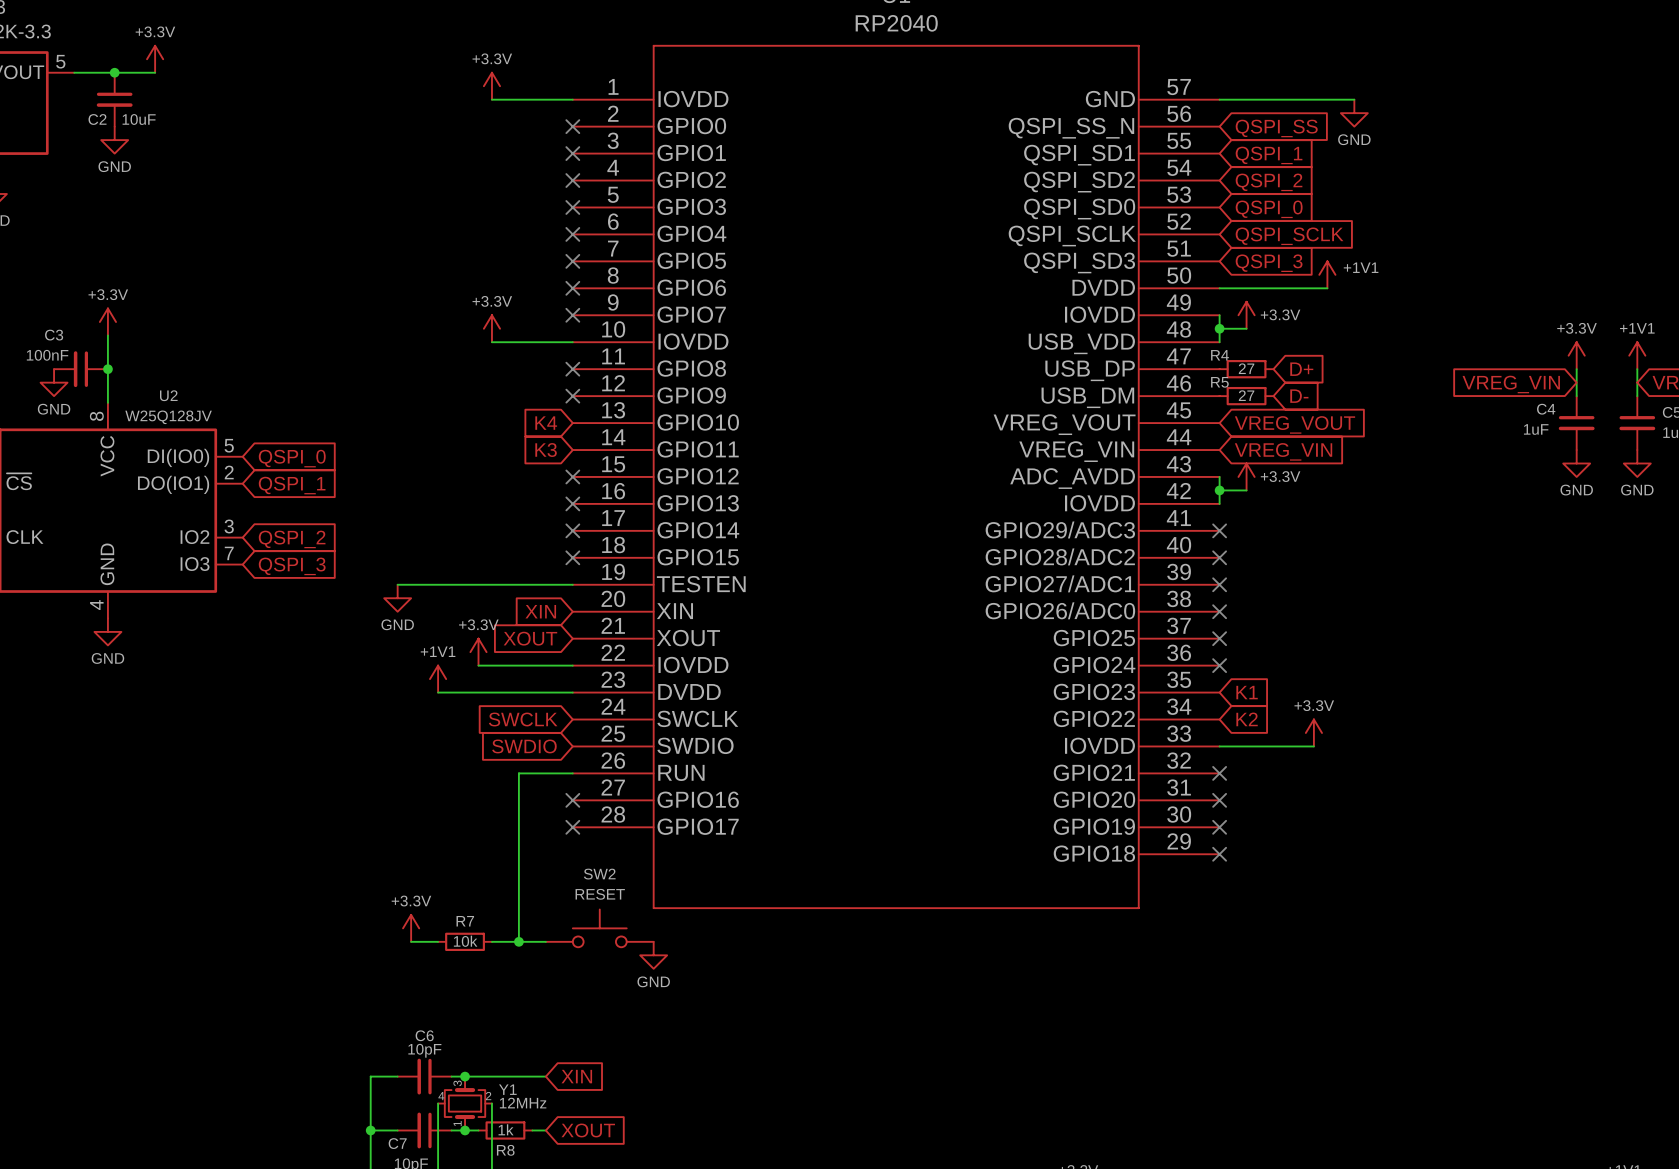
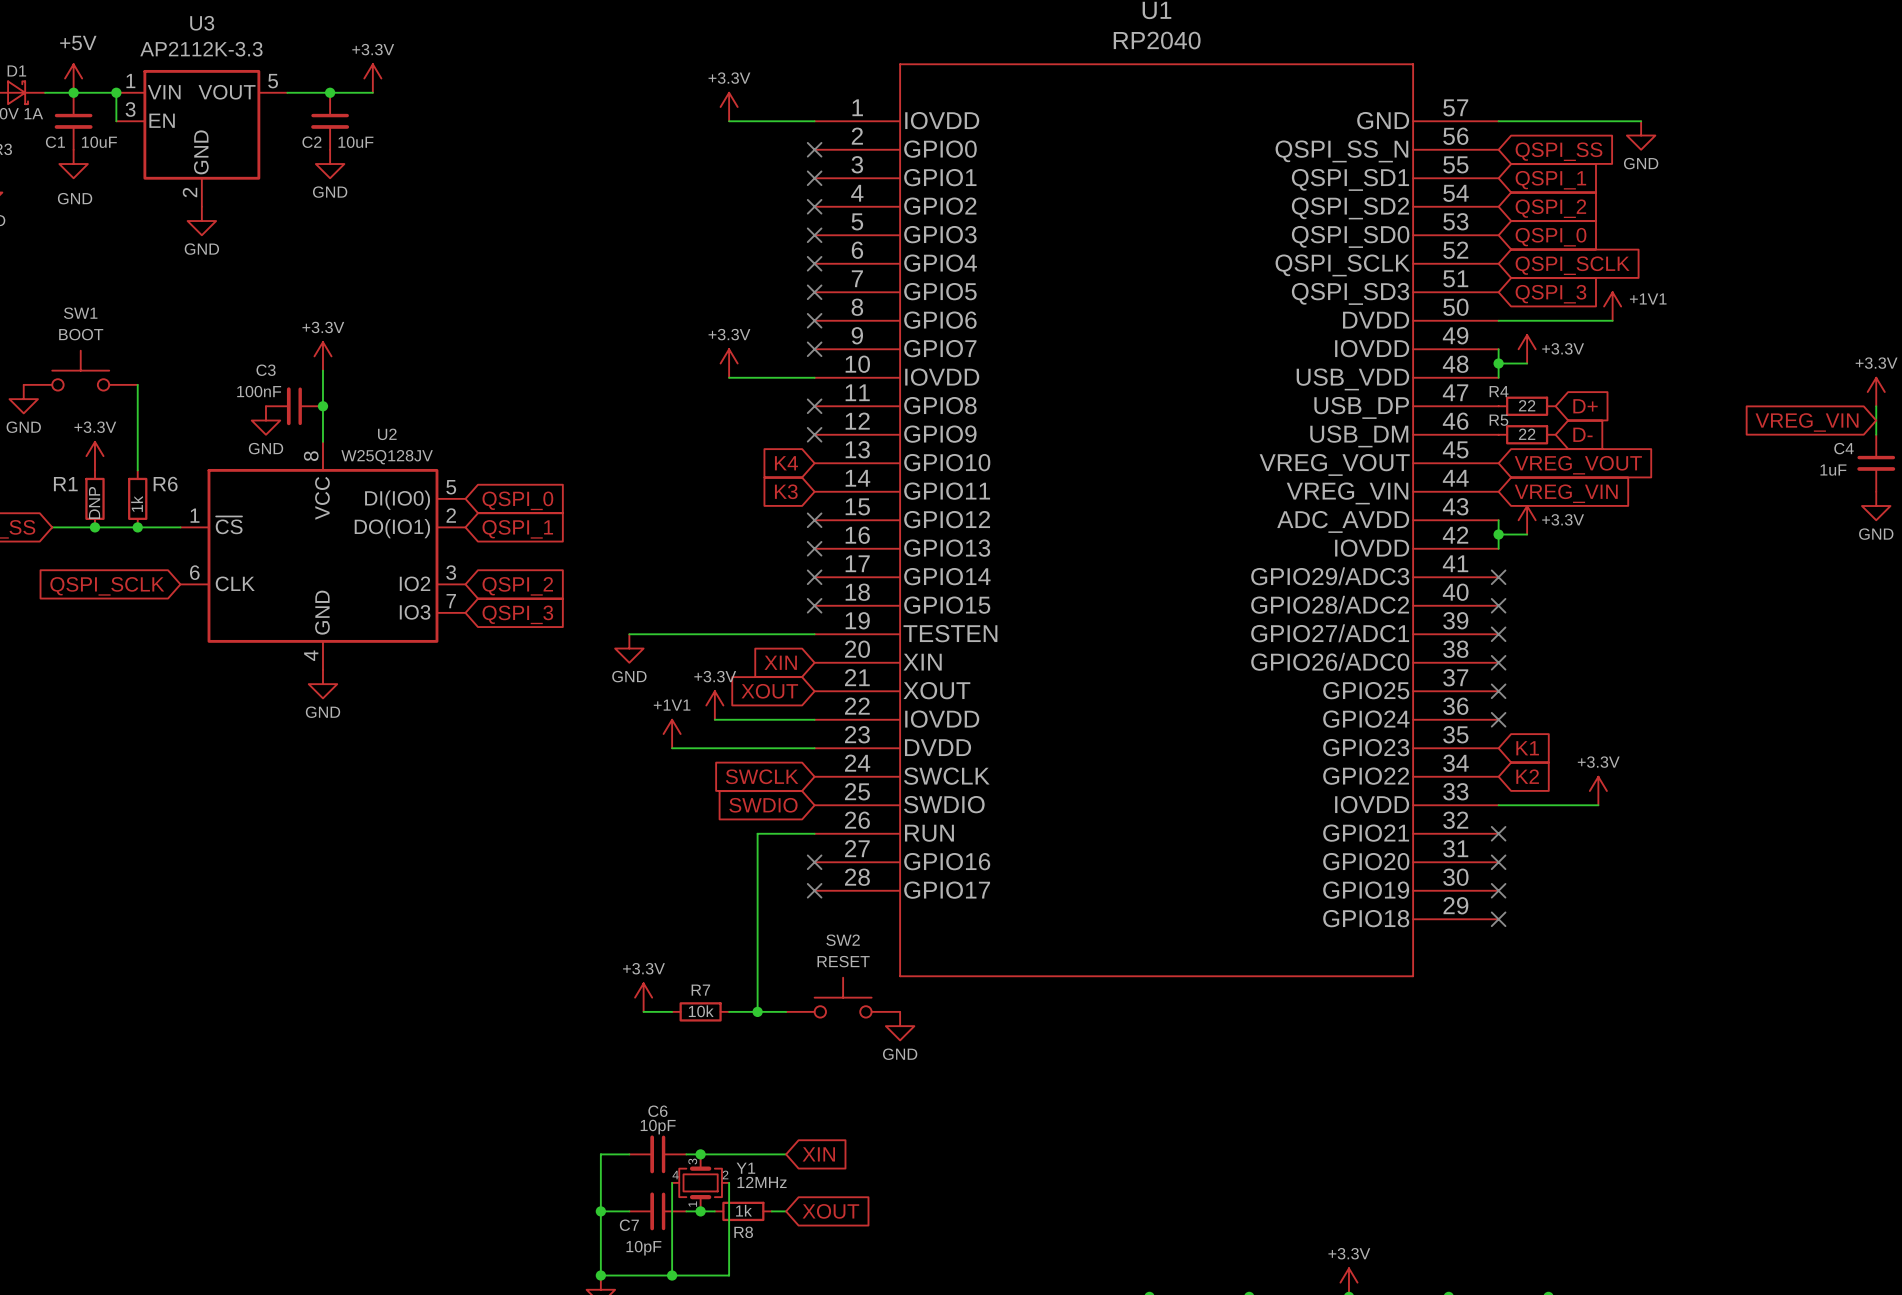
R4 value: 27 (1246, 368) -> 22 (1527, 405)
R5 value: 27 (1246, 395) -> 22 (1527, 434)

